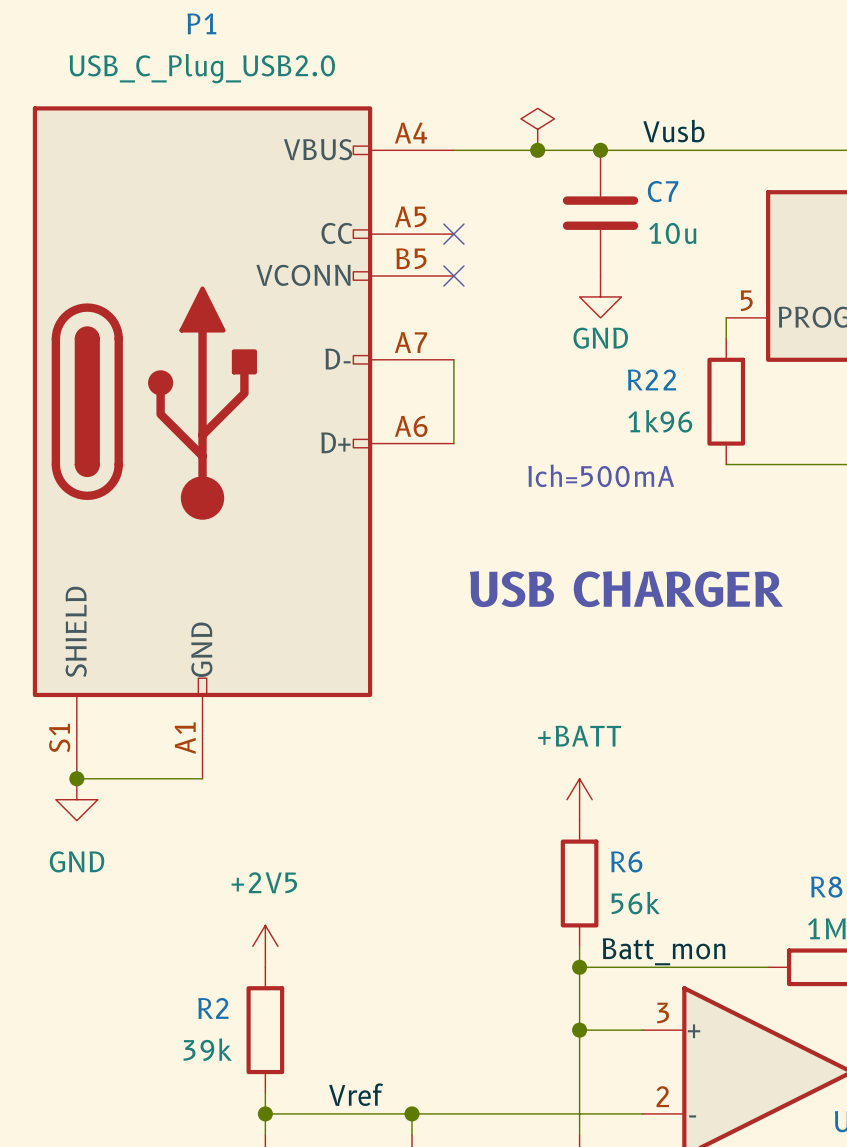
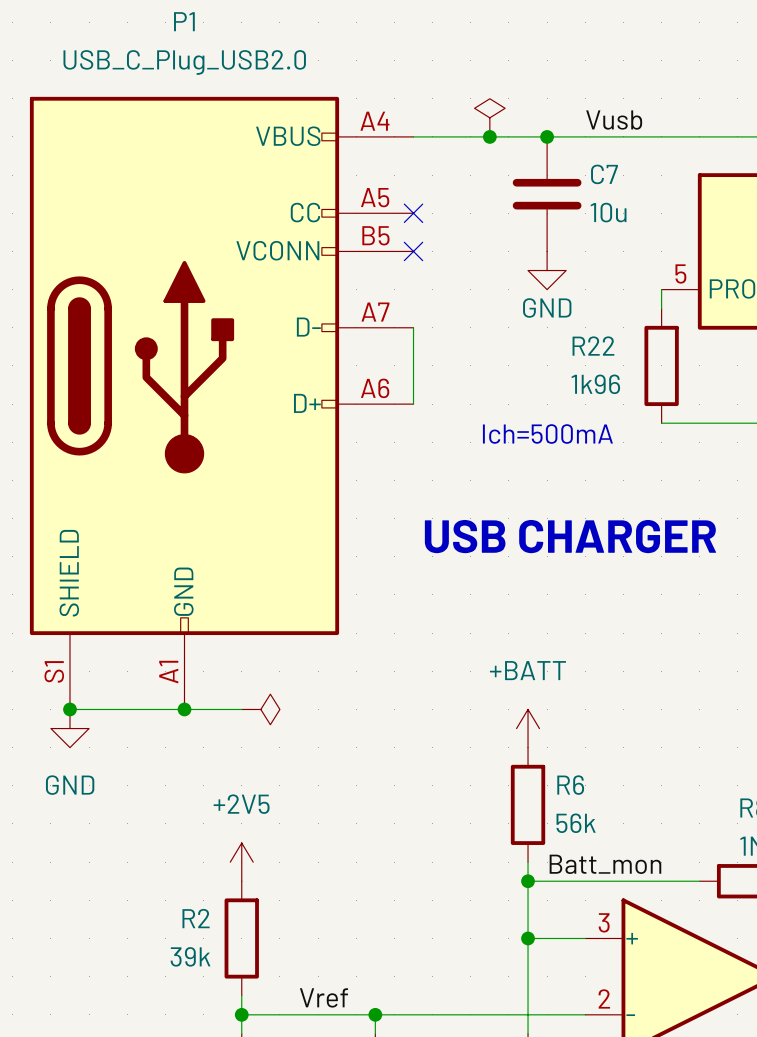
wire: none -> (184, 709) (241, 709)
junction: none -> (184, 709)
power symbol: none -> (260, 709)

